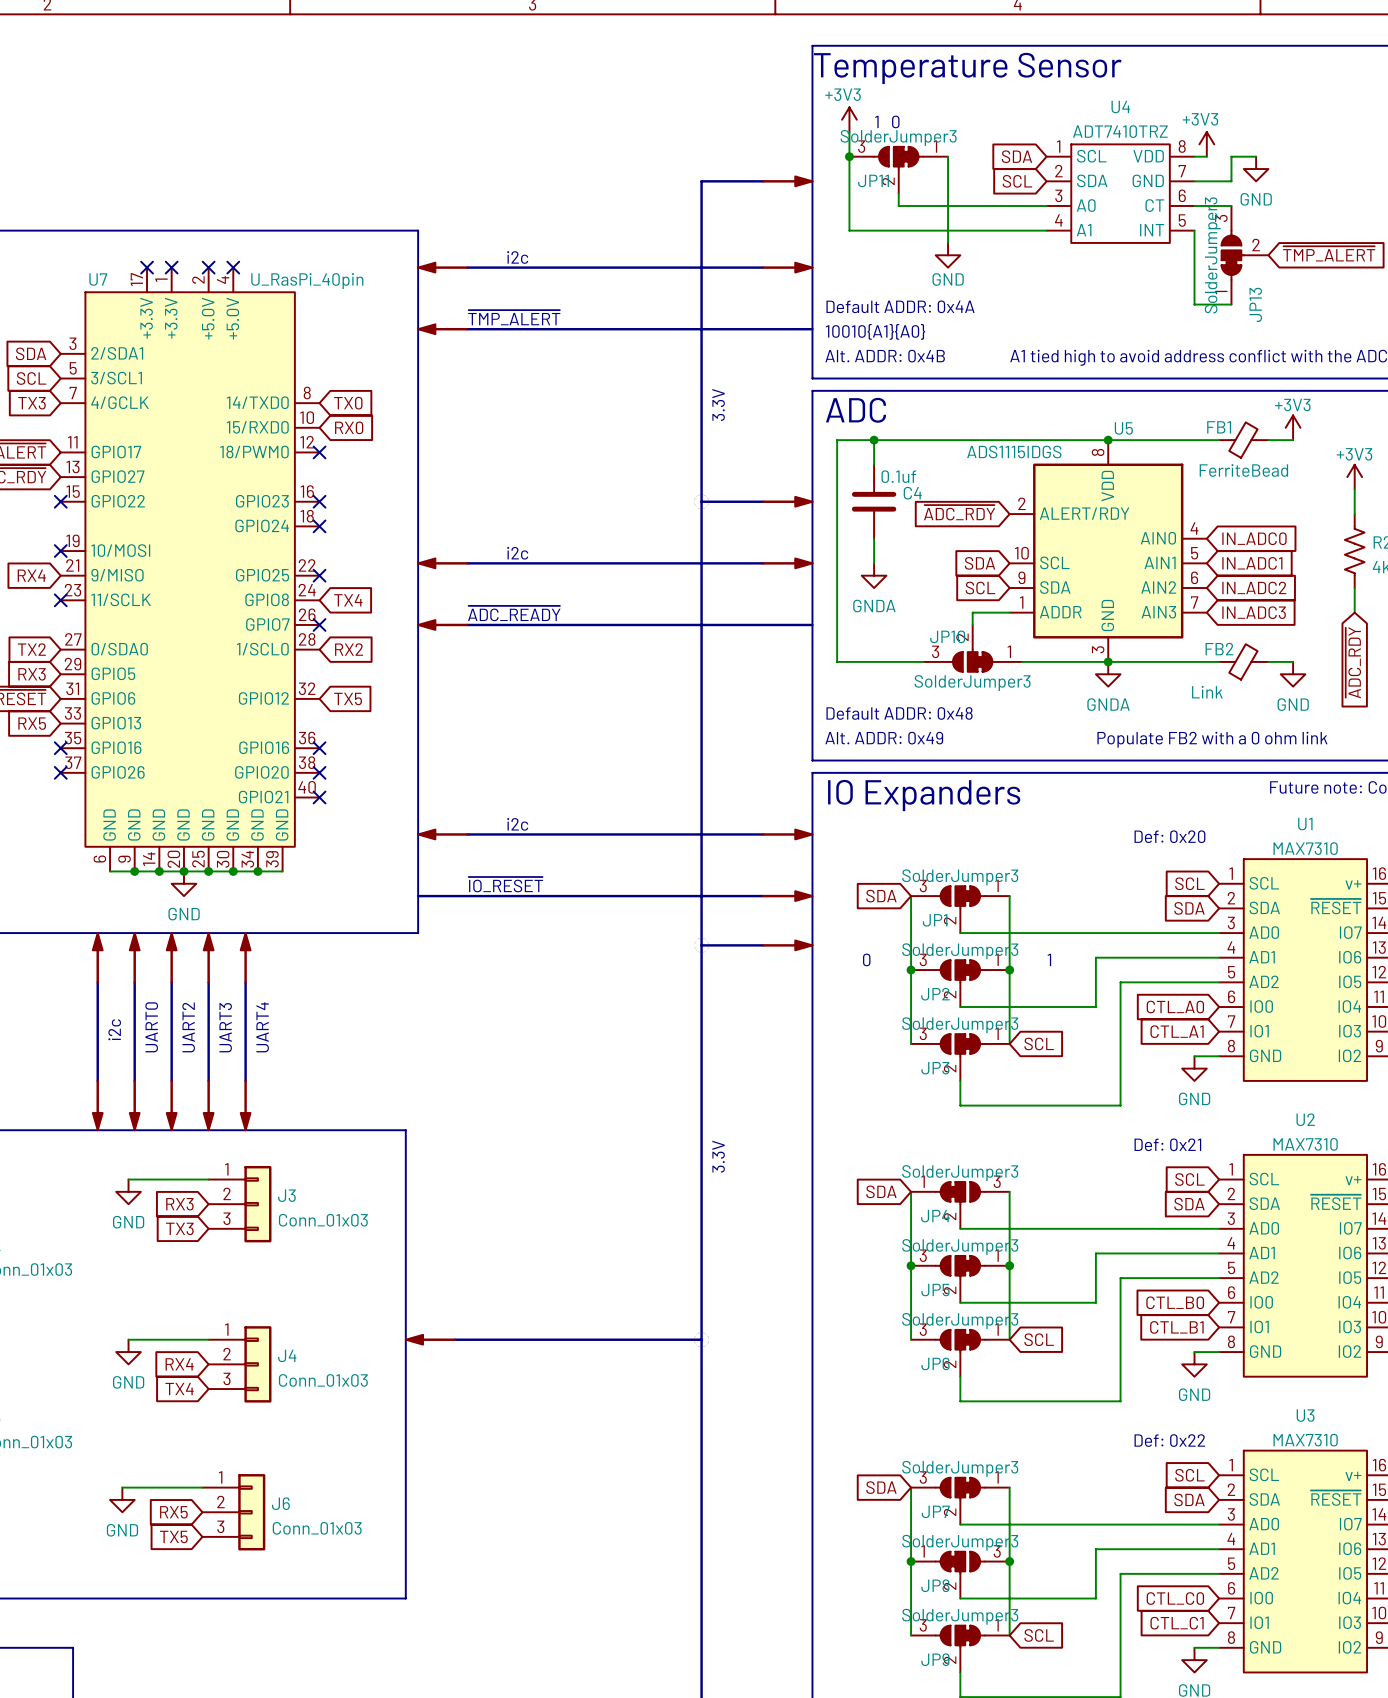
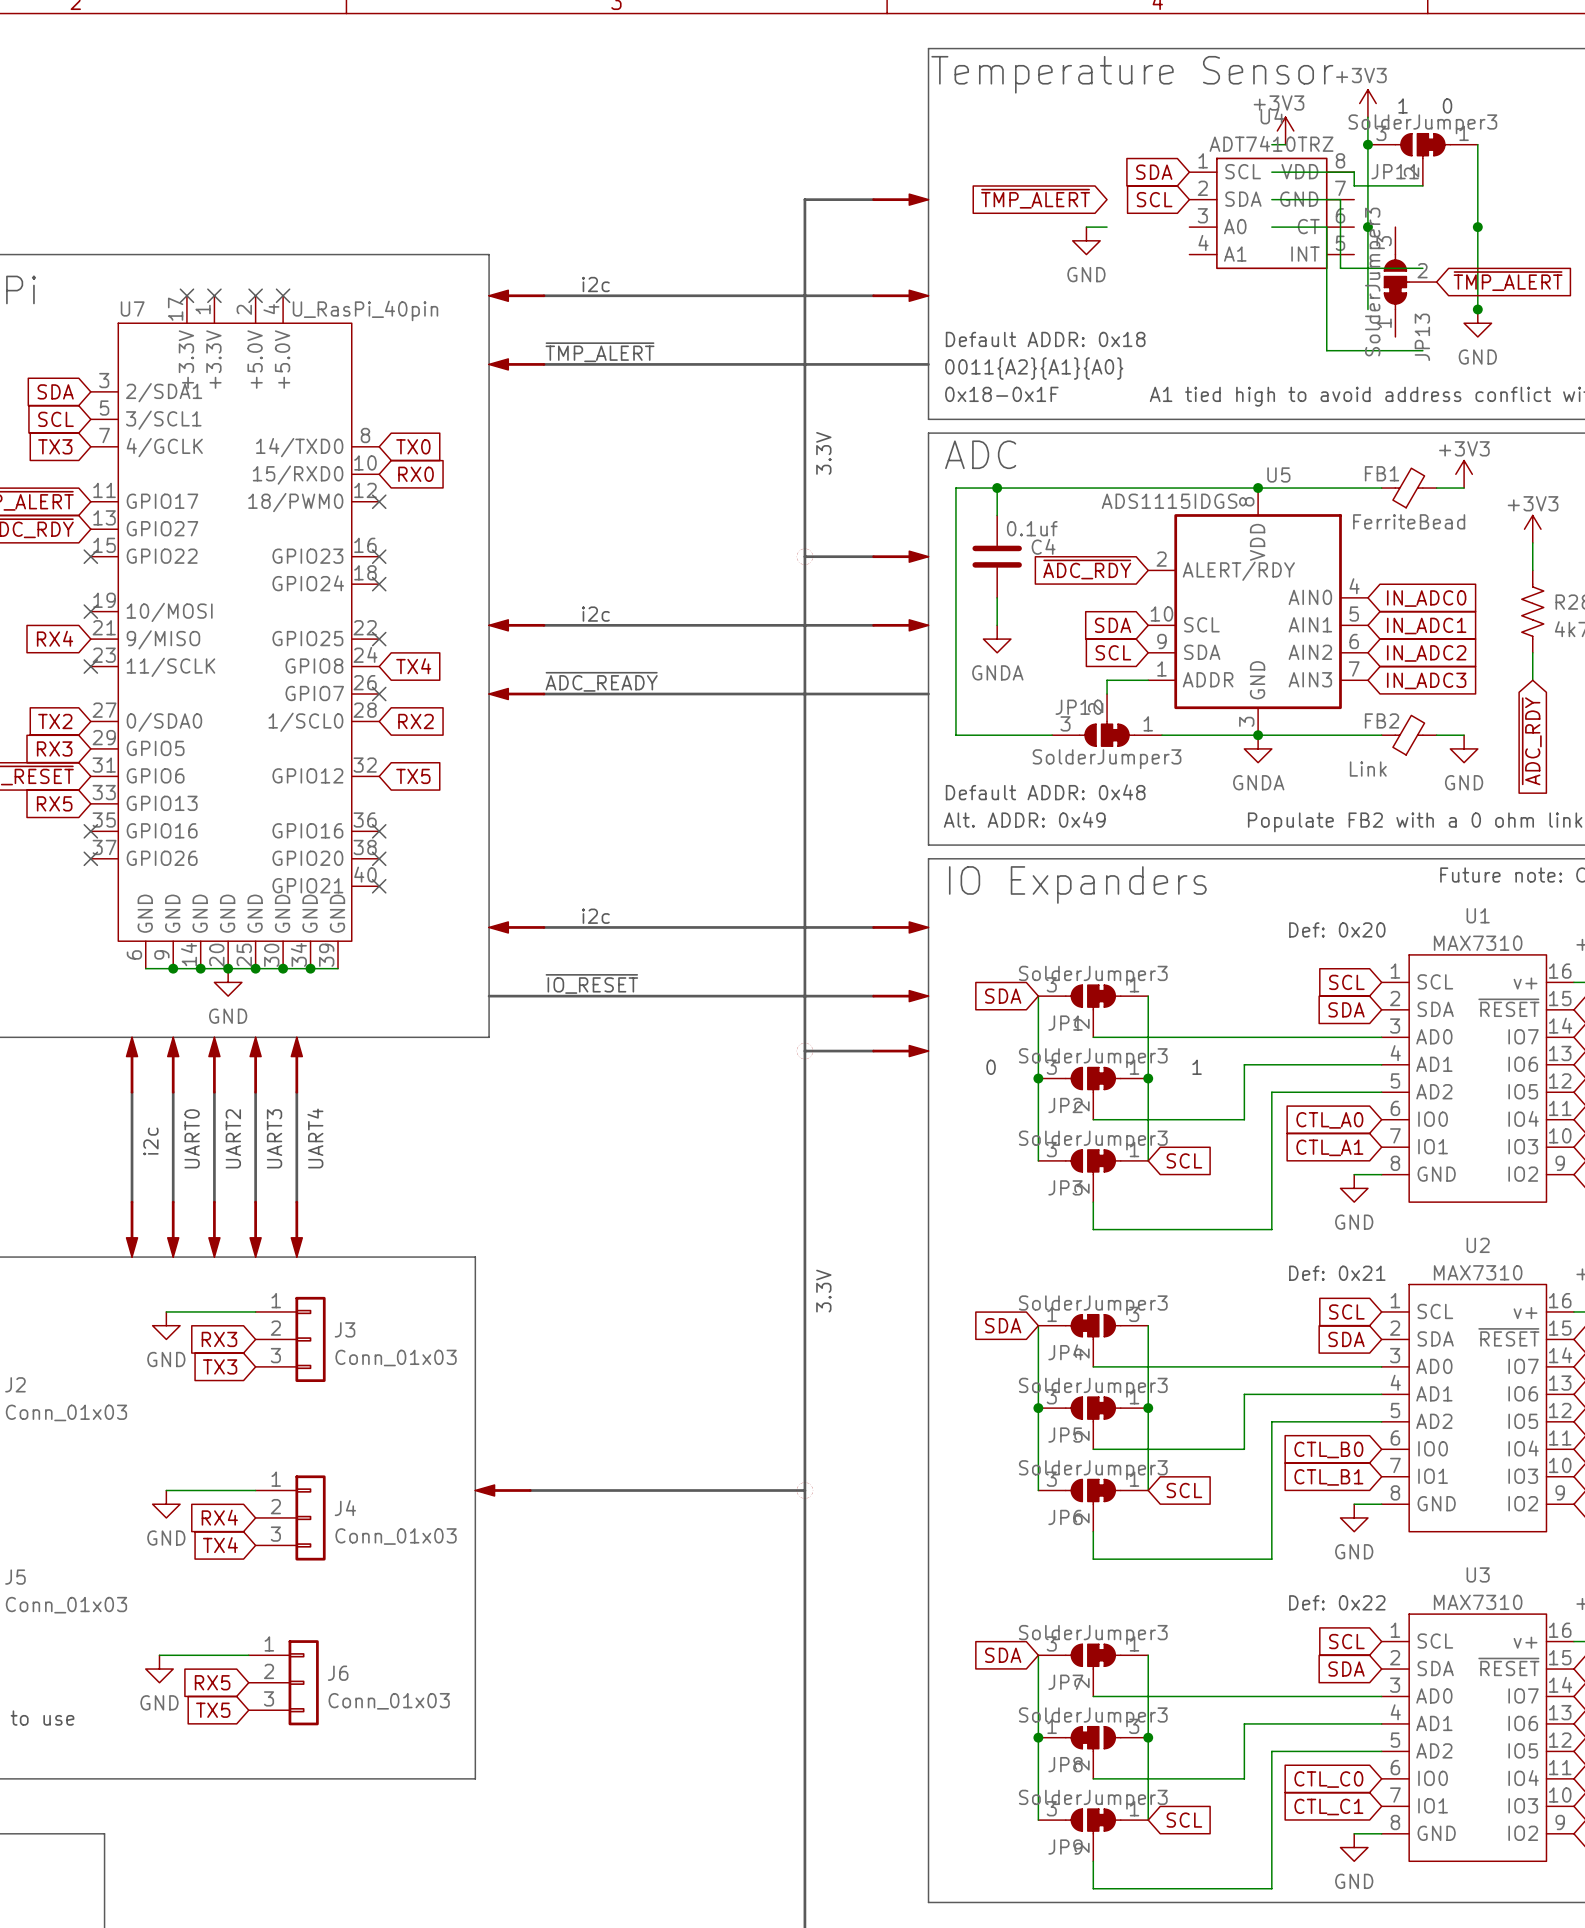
power symbol: none -> +3V3 (1367, 103)
text: none -> 1 0 (1425, 105)
wire: none -> (1367, 117) (1367, 309)
power symbol: +3V3 (849, 119) -> none
power symbol: none -> +3V3 (1285, 130)
text: 1 0 (887, 121) -> none
wire: (849, 132) (849, 230) (1046, 230) -> none
junction: none -> (1367, 144)
wire: none -> (1477, 144) (1477, 309)
power symbol: +3V3 (1206, 144) -> none
junction: (849, 156) -> none
wire: (948, 156) (948, 242) -> none
wire: none -> (1271, 172) (1354, 172) (1354, 185) (1422, 185)
wire: (1194, 156) (1206, 156) -> (1271, 144) (1285, 144)
wire: (1256, 156) (1231, 156) (1231, 181) (1194, 181) -> none
power symbol position: GND (1256, 169) -> GND (1477, 323)
JP11 position: (898, 170) -> (1422, 159)
global label: none -> ~{TMP_ALERT} (1035, 198)
wire: none -> (1271, 199) (1340, 199) (1340, 268) (1422, 268)
wire: (898, 193) (898, 205) (954, 205) -> none
wire: (972, 205) (1046, 205) -> none
wire: none -> (1271, 227) (1326, 227) (1326, 350) (1422, 350)
wire: (1194, 205) (1231, 205) -> none
junction: none -> (1367, 227)
junction: none -> (1477, 227)
wire: (1194, 230) (1194, 304) (1231, 304) -> none
power symbol position: GND (948, 255) -> GND (1086, 240)
power symbol text position: GND (948, 279) -> GND (1086, 274)
junction: none -> (1477, 309)
text: Default ADDR: 0x4A (900, 306) -> Default ADDR: 0x18 (1045, 339)
text: 10010{A1}{A0} (875, 331) -> 0011{A2}{A1}{A0} (1034, 368)
text: Alt. ADDR: 0x4B (885, 356) -> 0x18-0x1F (1001, 394)

